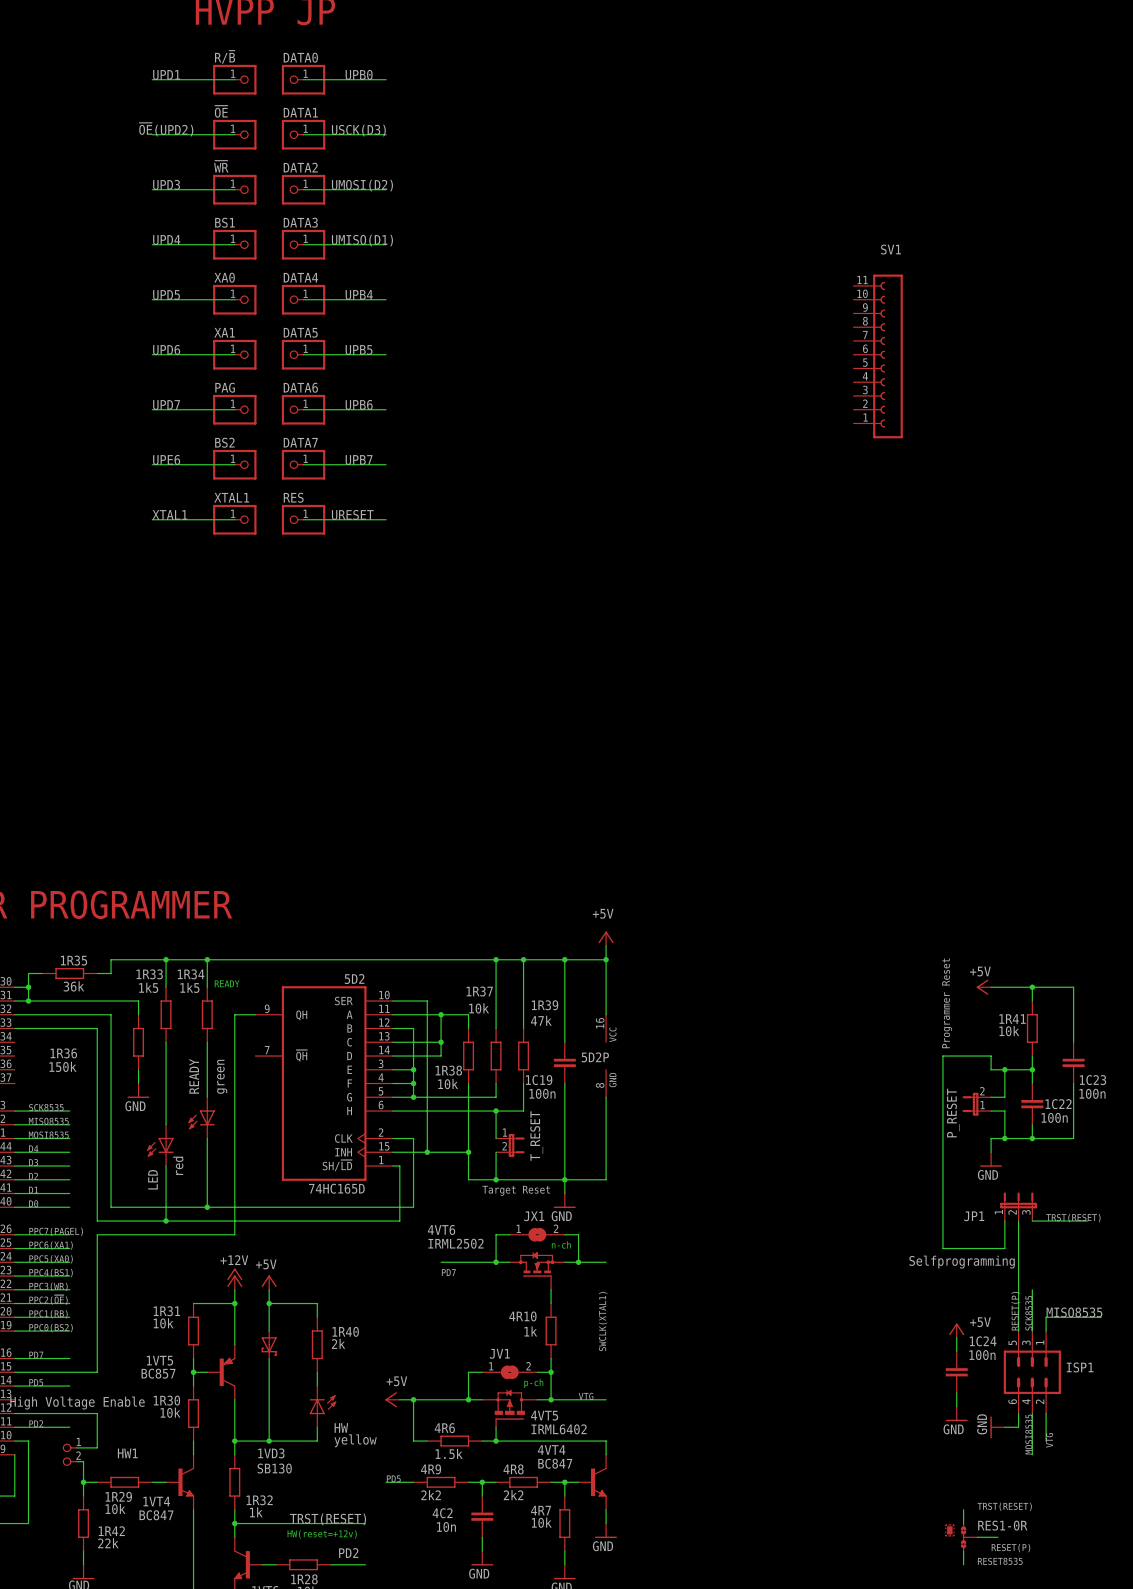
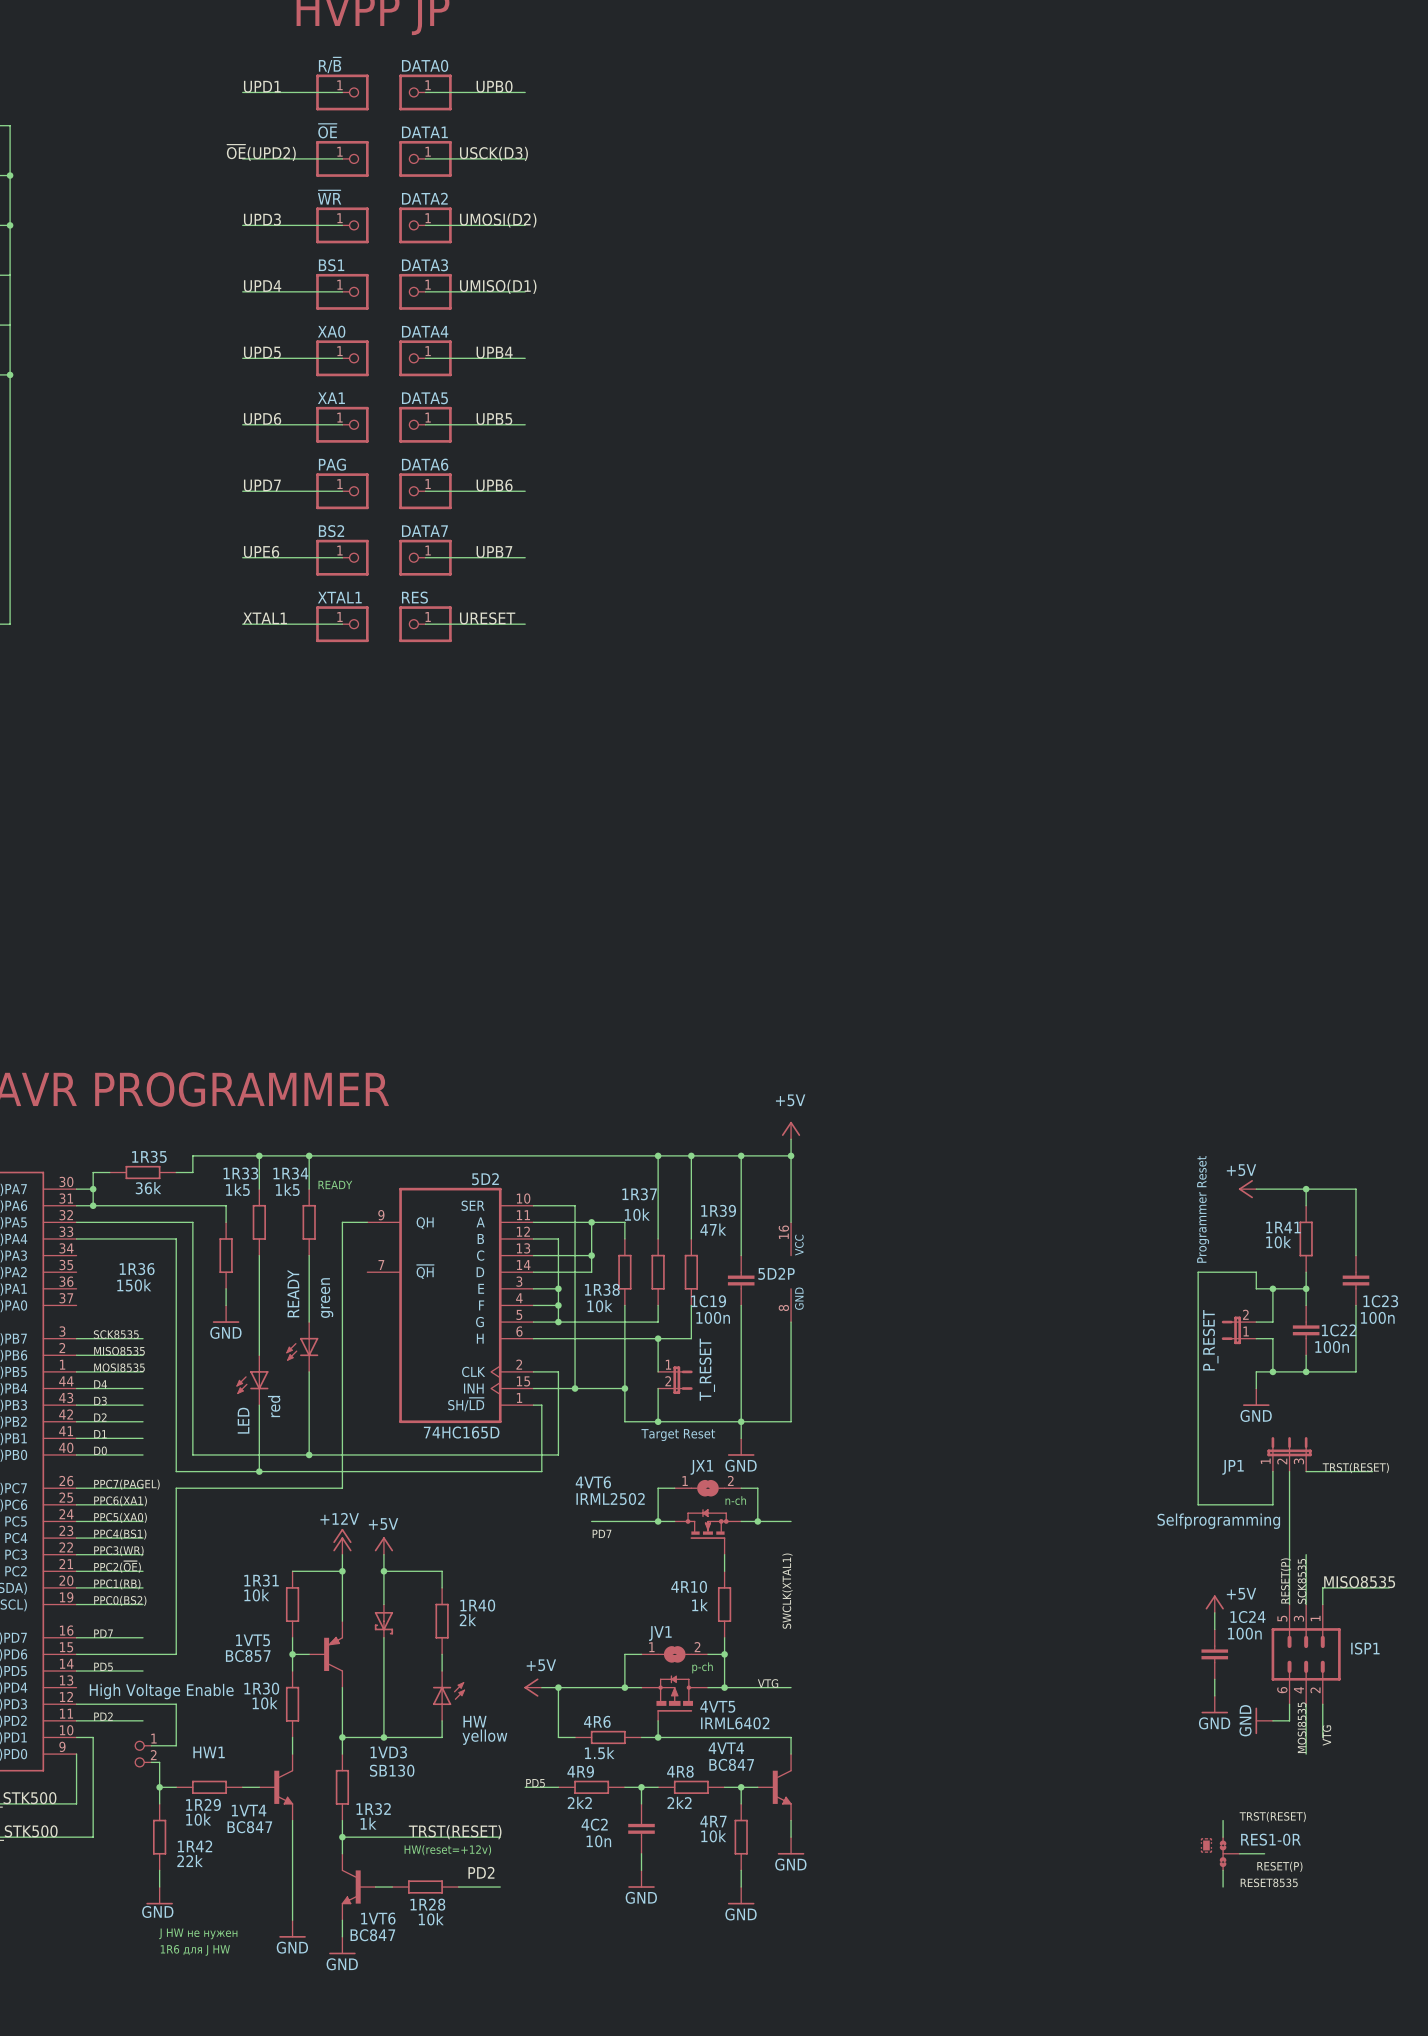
SV1: (878, 356) -> none

